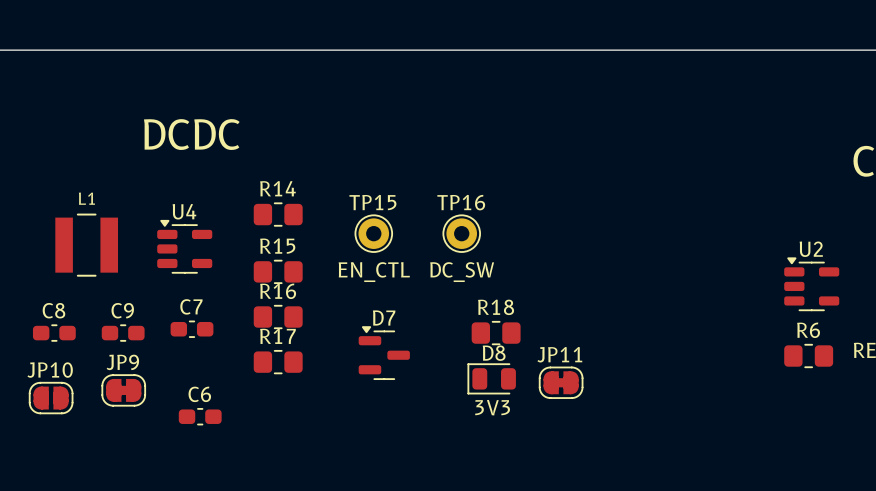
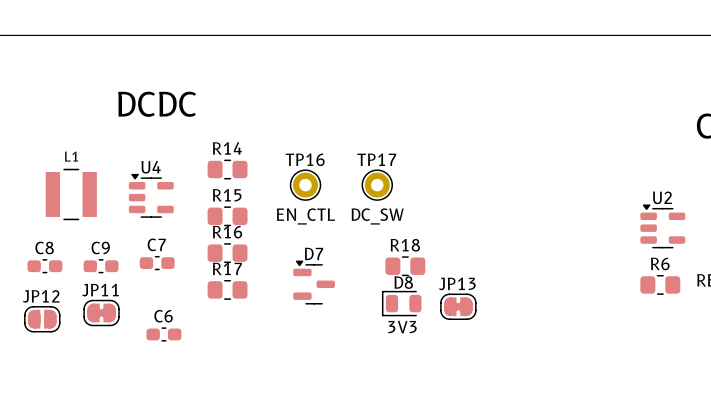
TP15 name: TP15 (372, 202) -> TP16 (305, 159)
TP16 name: TP16 (461, 202) -> TP17 (376, 159)
JP11 name: JP11 (559, 354) -> JP13 (457, 283)
JP9 name: JP9 (122, 362) -> JP11 (100, 290)
JP10 name: JP10 (50, 370) -> JP12 (41, 296)

